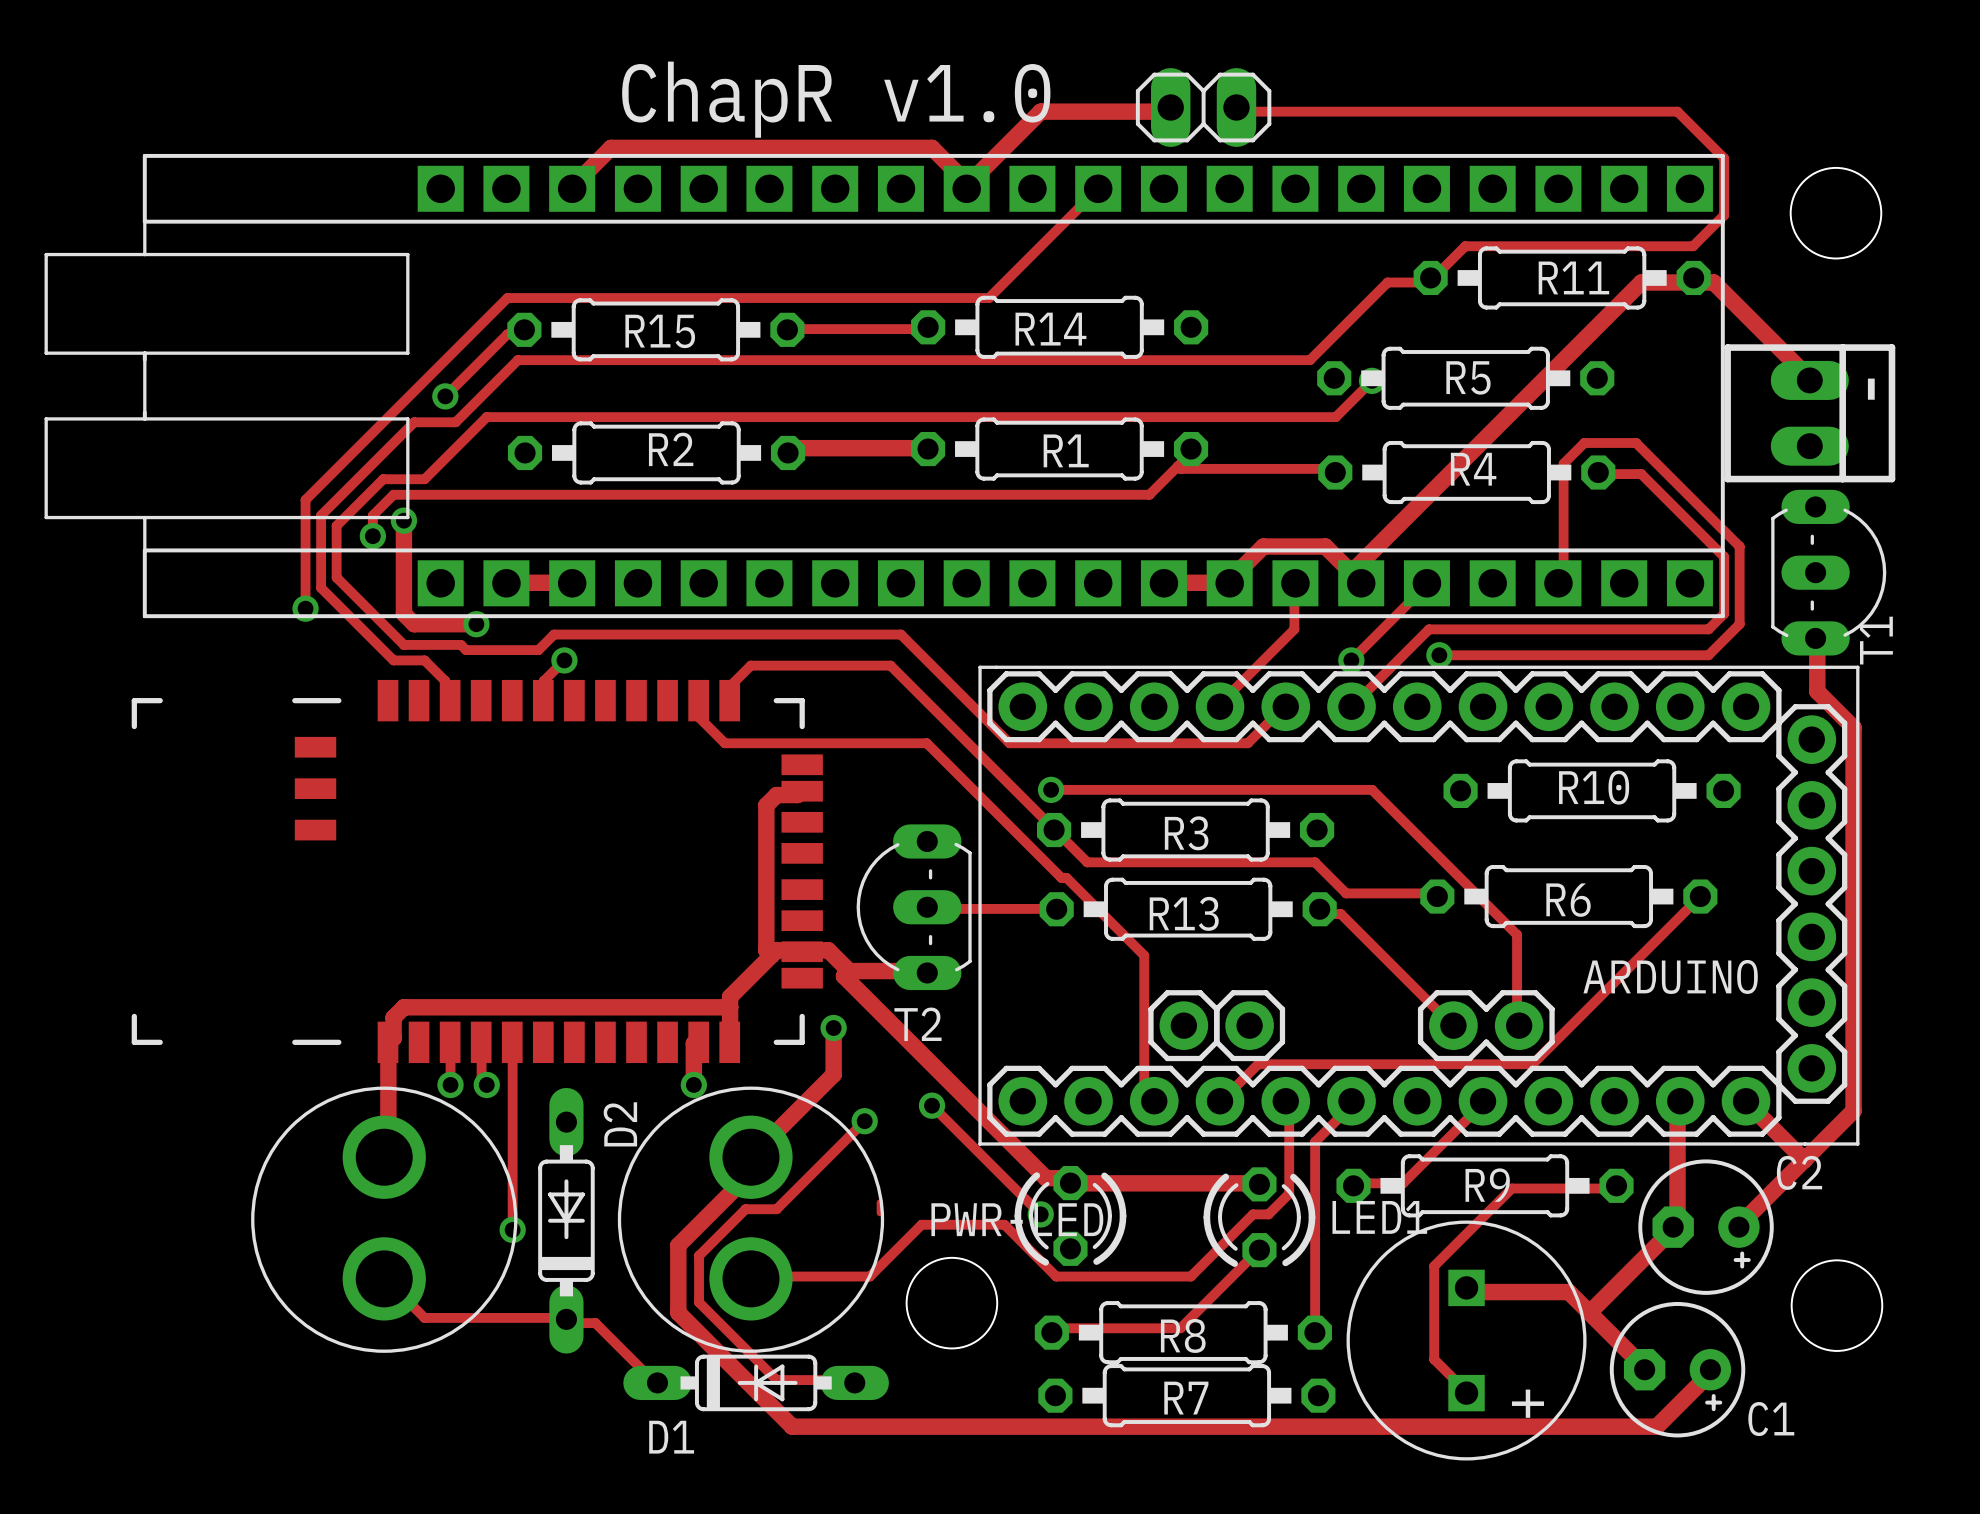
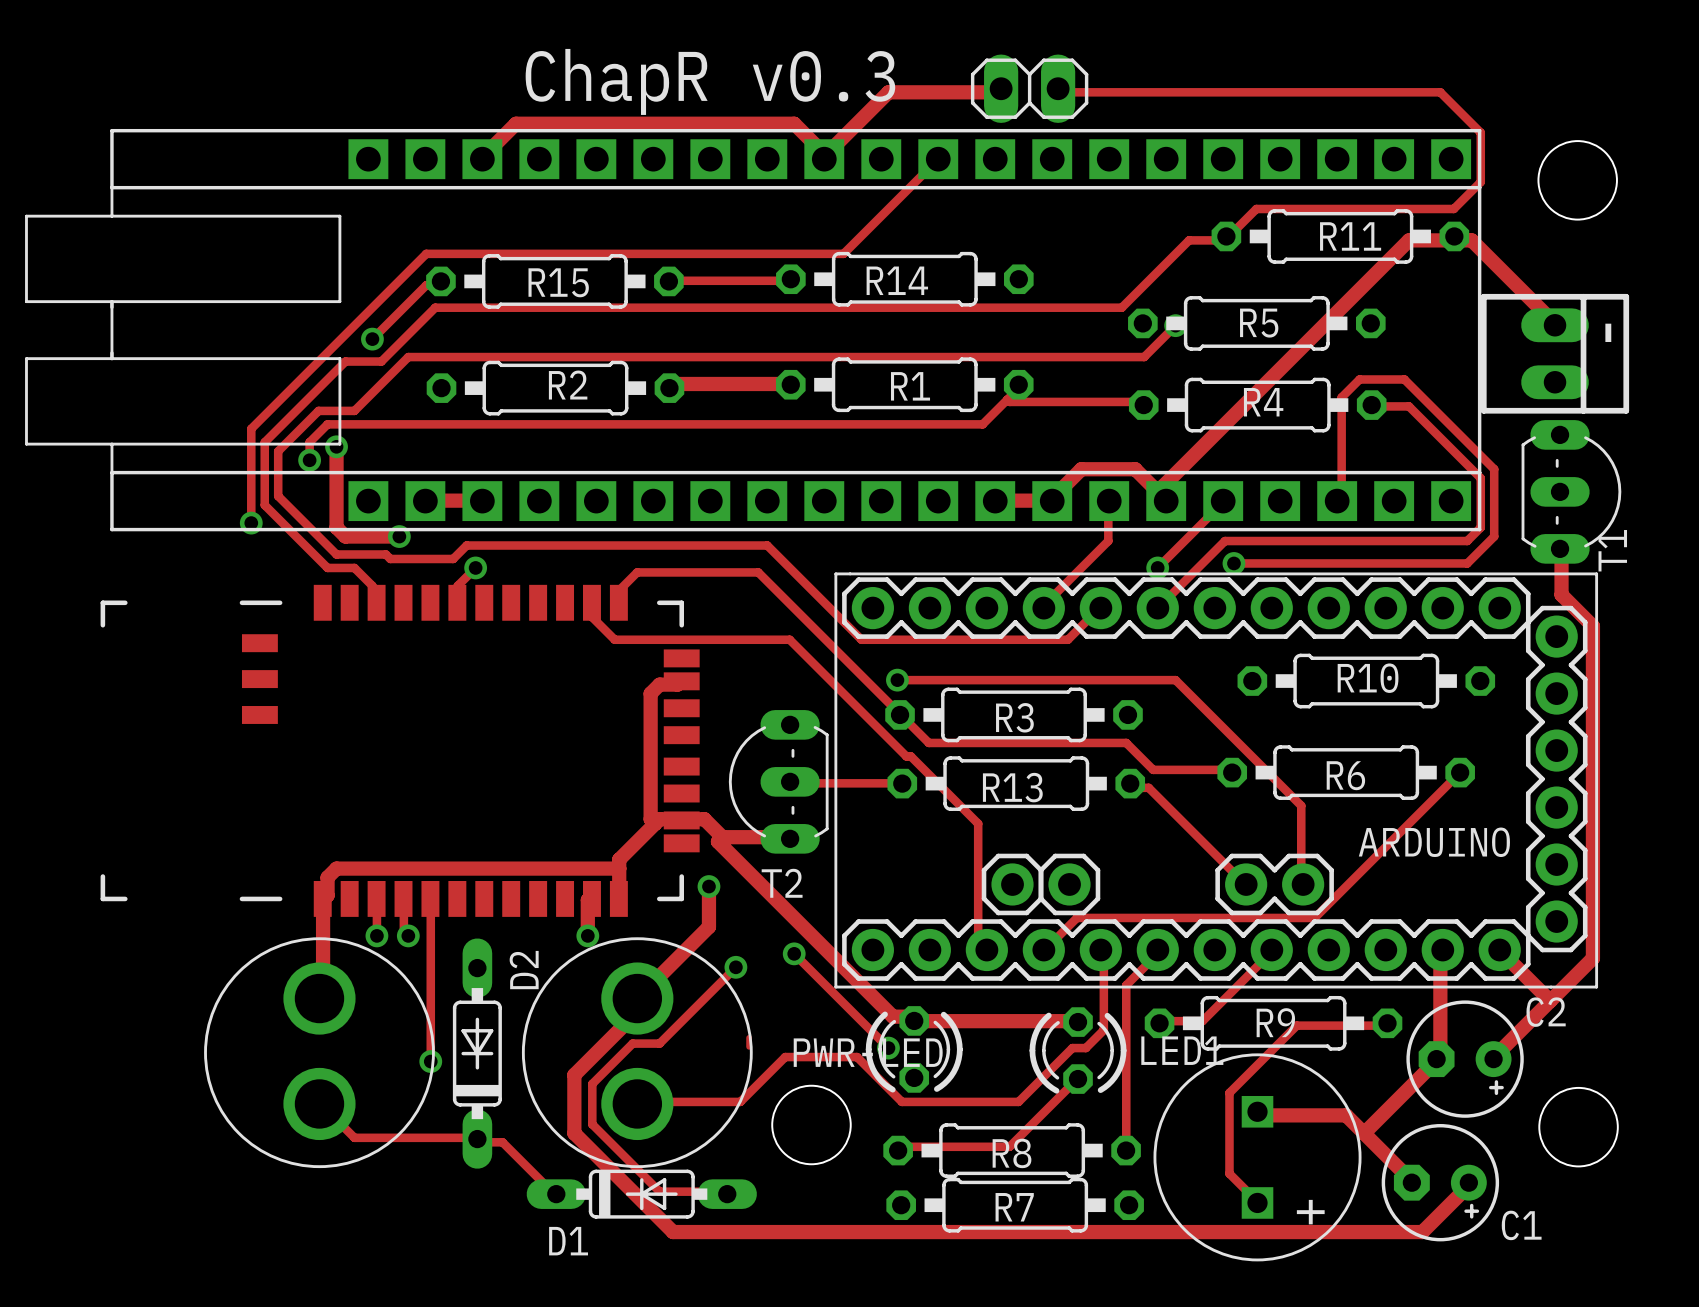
text: ChapR v1.0 (836, 99) -> ChapR v0.3 (710, 81)

